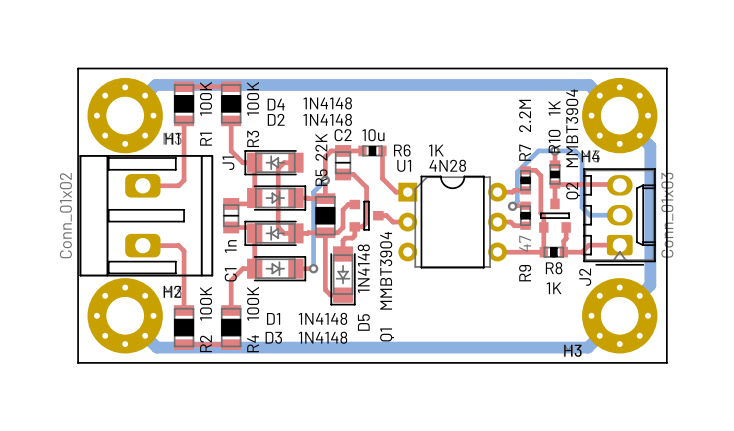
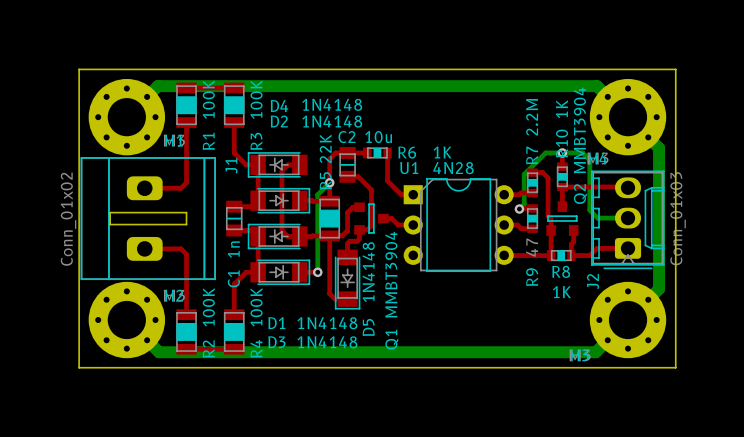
board edge: (108, 158) (108, 169) (175, 169) (175, 158) (108, 158) -> none
board edge: (108, 261) (108, 273) (175, 273) (175, 261) (108, 261) -> none

